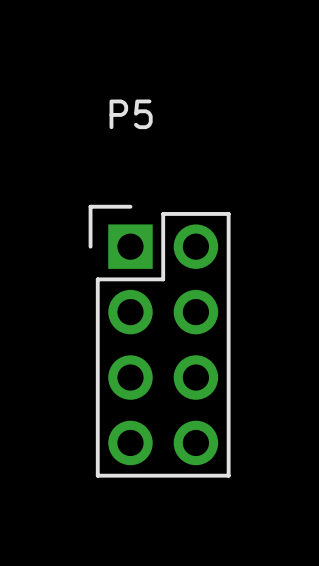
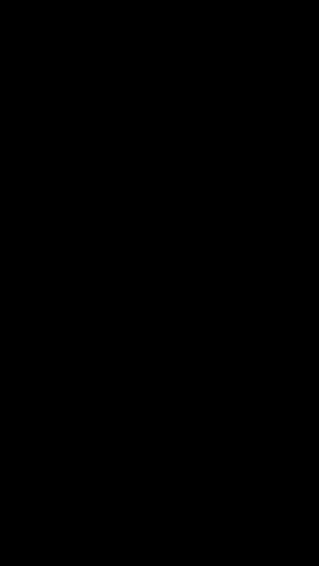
P5: (159, 341) -> none

